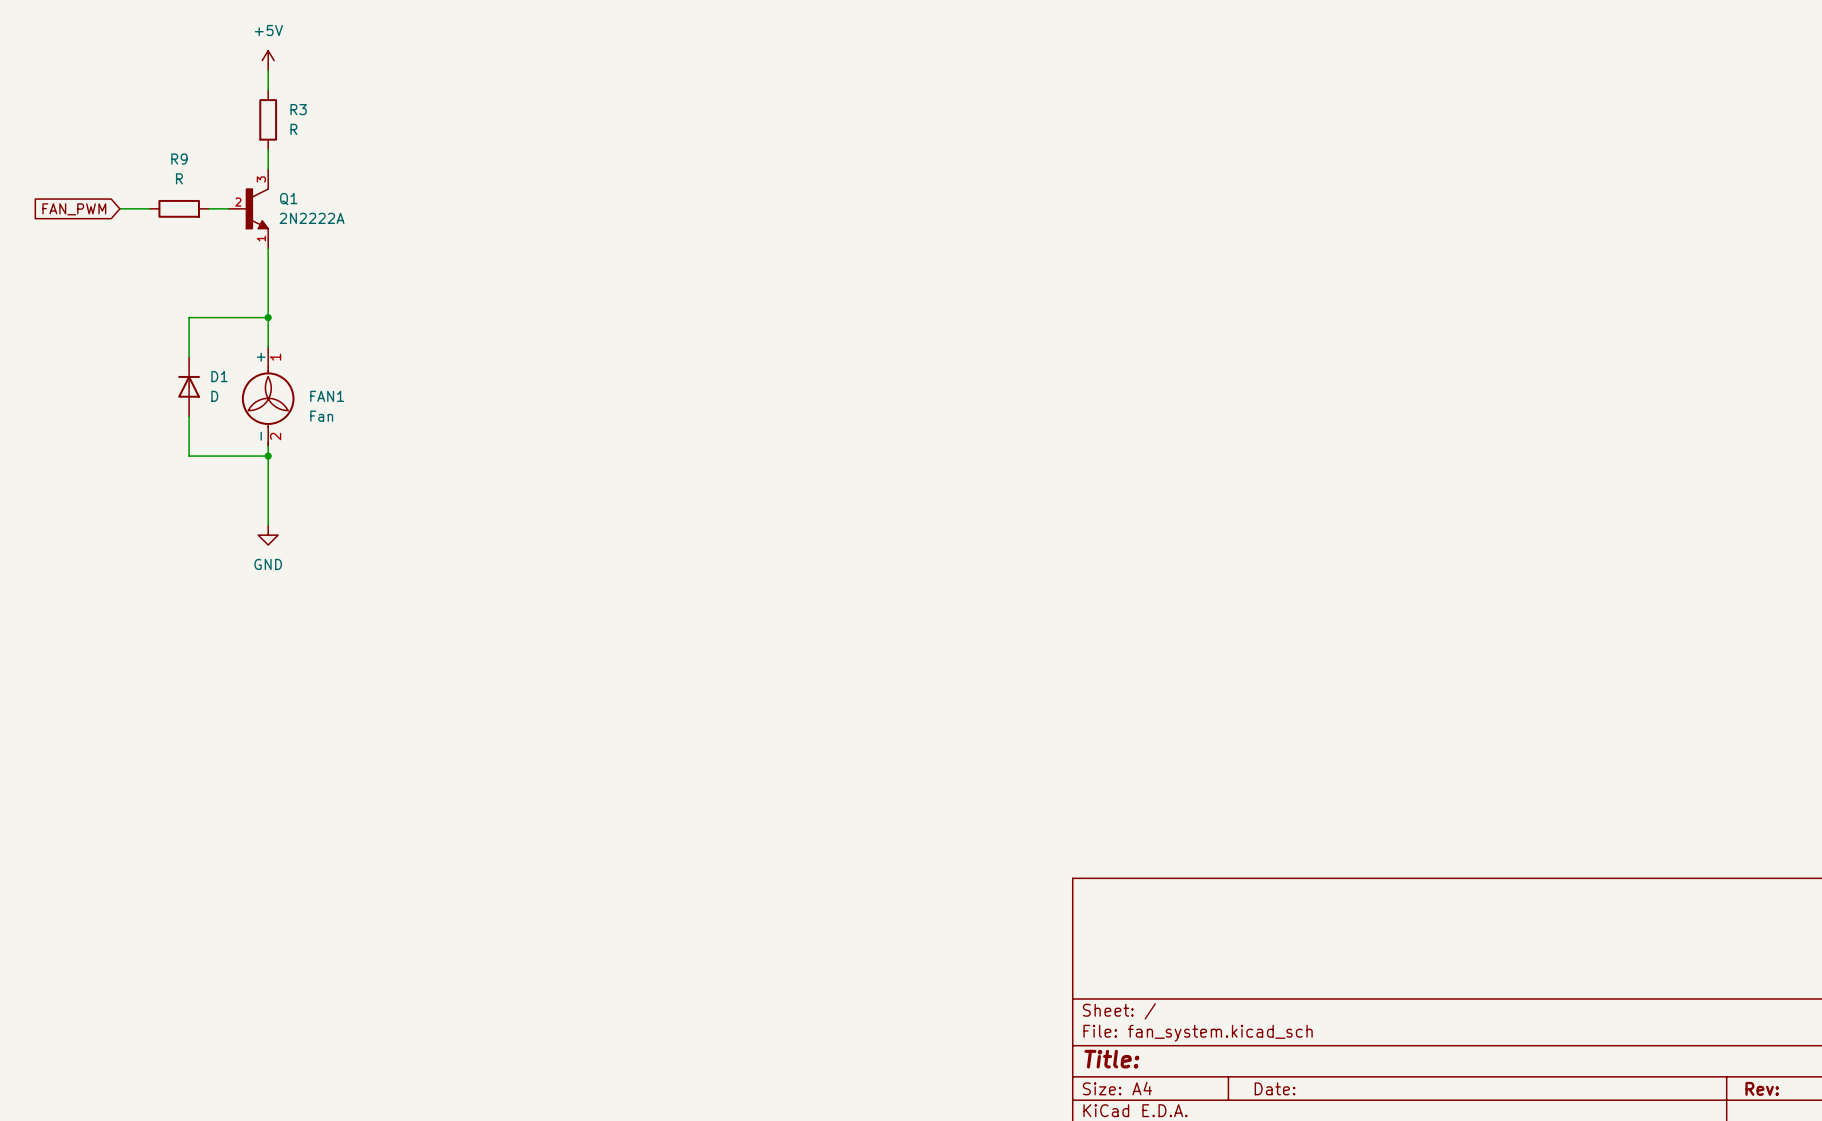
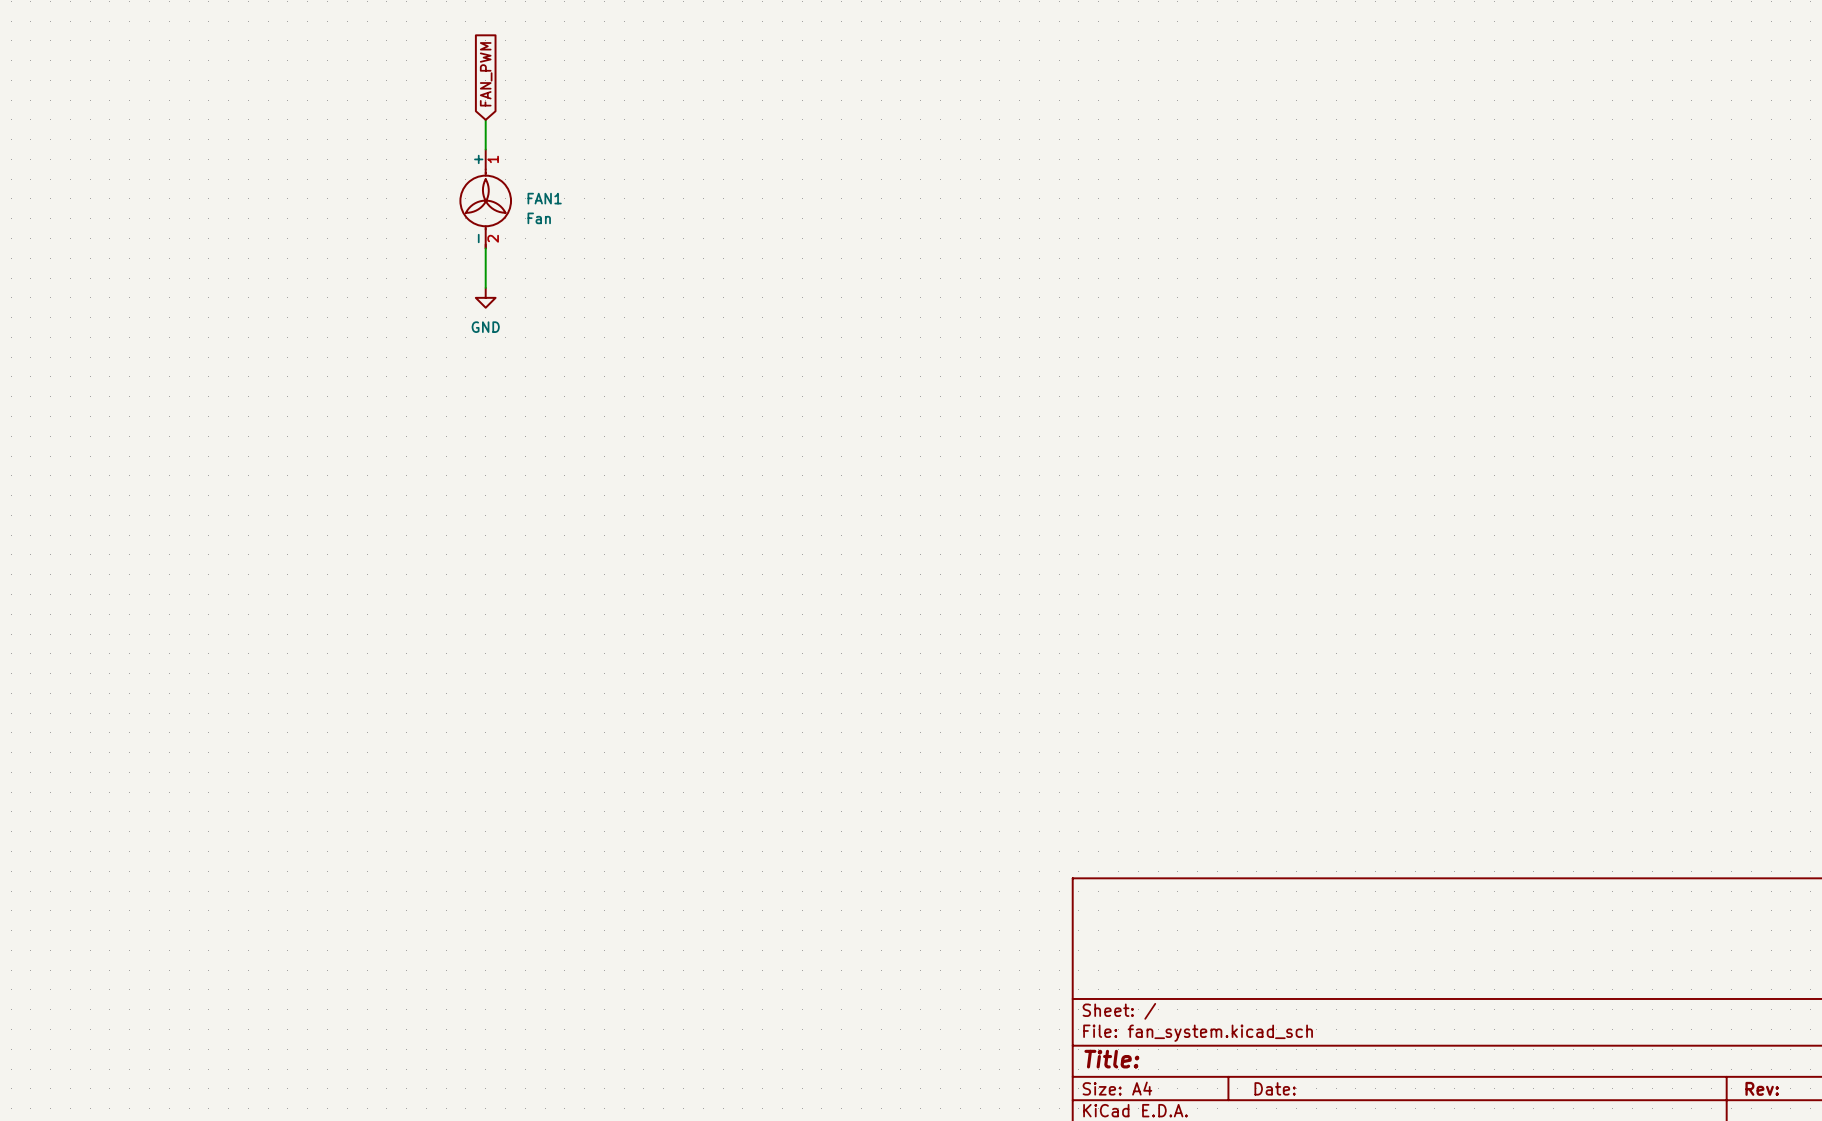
power symbol: +5V (268, 60) -> none
wire: (268, 70) (268, 90) -> none
global label: none -> FAN_PWM (486, 74)
R3: R (268, 119) -> none
wire: none -> (485, 119) (485, 149)
wire: (268, 149) (268, 169) -> none
wire: (119, 208) (149, 208) -> none
R9: R (179, 208) -> none
wire: (208, 208) (228, 208) -> none
Q1: 2N2222A (248, 208) -> none
global label: FAN_PWM (74, 209) -> none
wire: (268, 248) (268, 347) -> none
wire: none -> (485, 248) (485, 287)
power symbol: none -> GND (485, 297)
wire: (268, 317) (189, 317) (189, 357) -> none
junction: (268, 317) -> none
D1: D (189, 386) -> none
FAN1 position: (268, 396) -> (485, 198)
wire: (189, 416) (189, 456) (268, 456) -> none
wire: (268, 446) (268, 525) -> none
junction: (268, 456) -> none
power symbol: GND (268, 535) -> none

